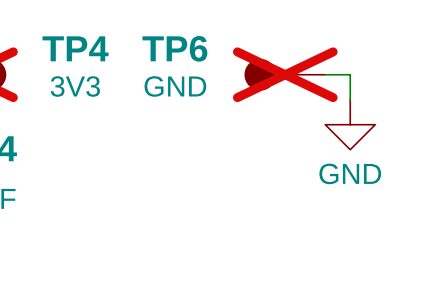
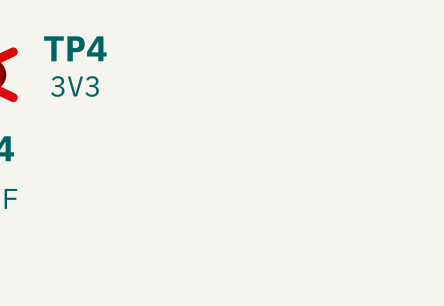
TP6: GND (285, 74) -> none
wire: (325, 74) (350, 74) (350, 99) -> none
power symbol: GND (350, 124) -> none

